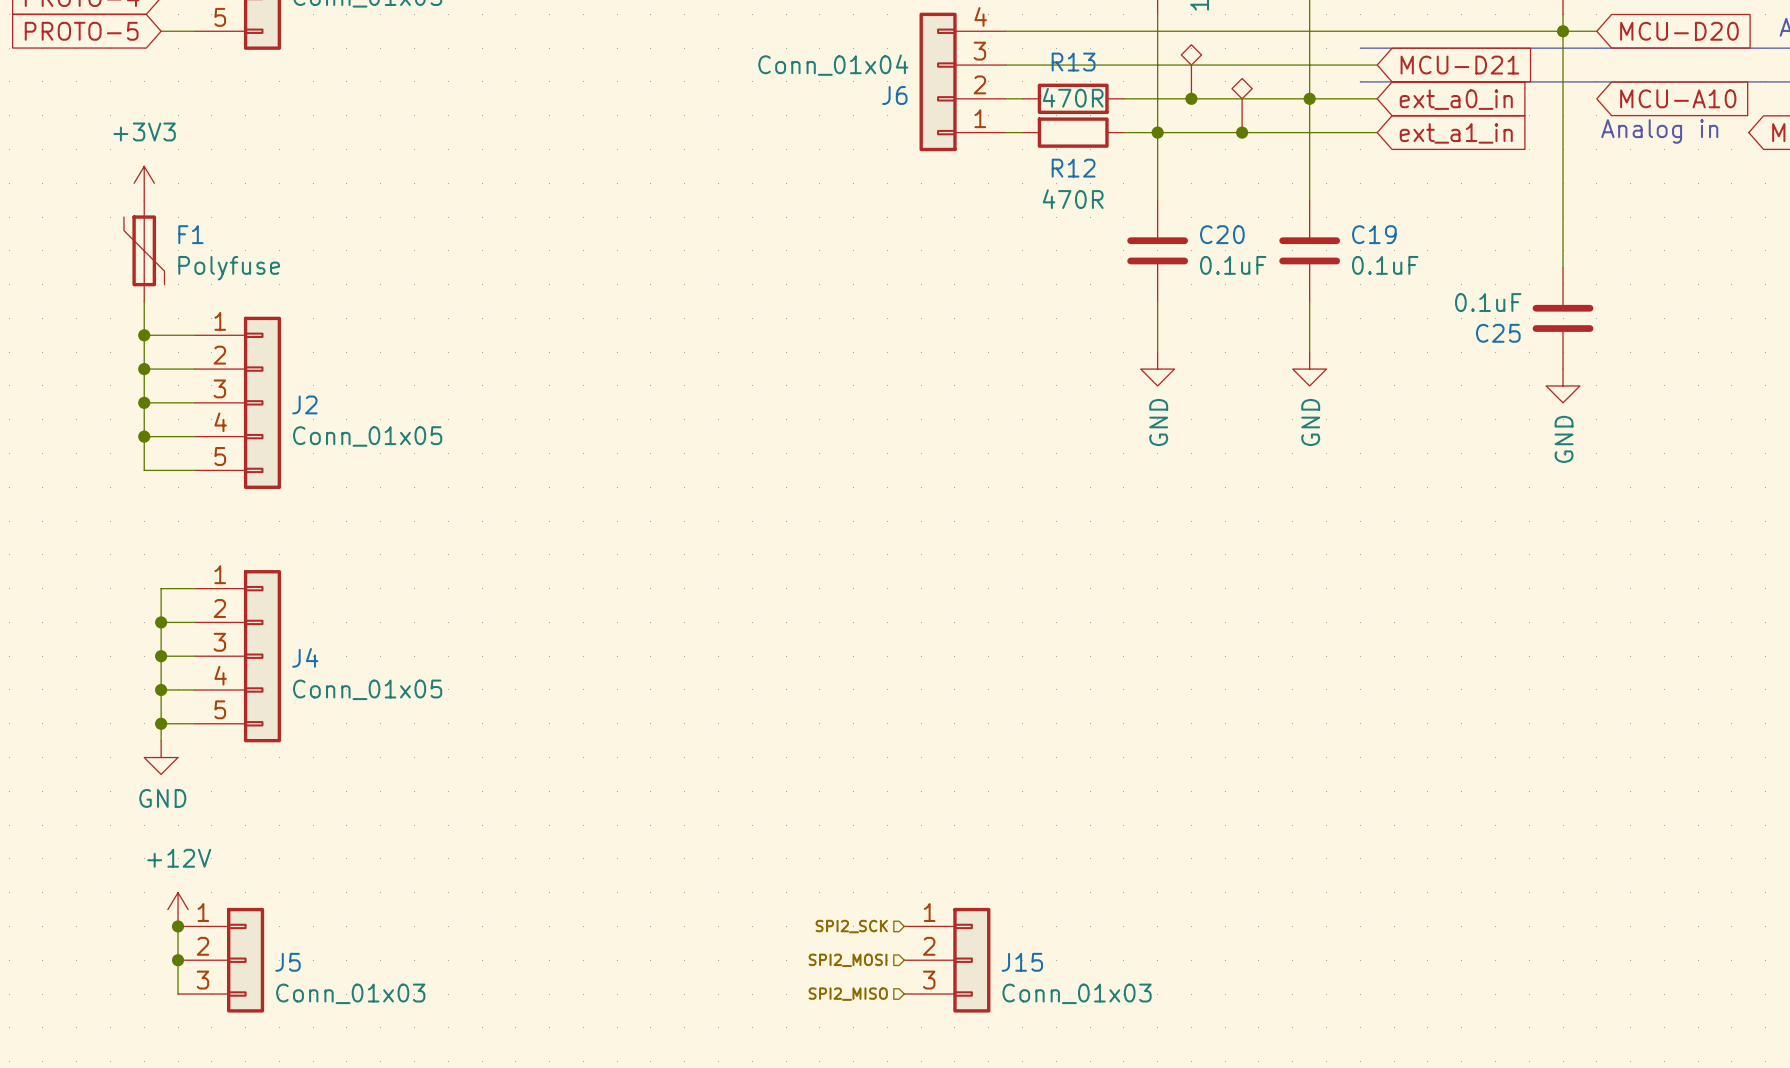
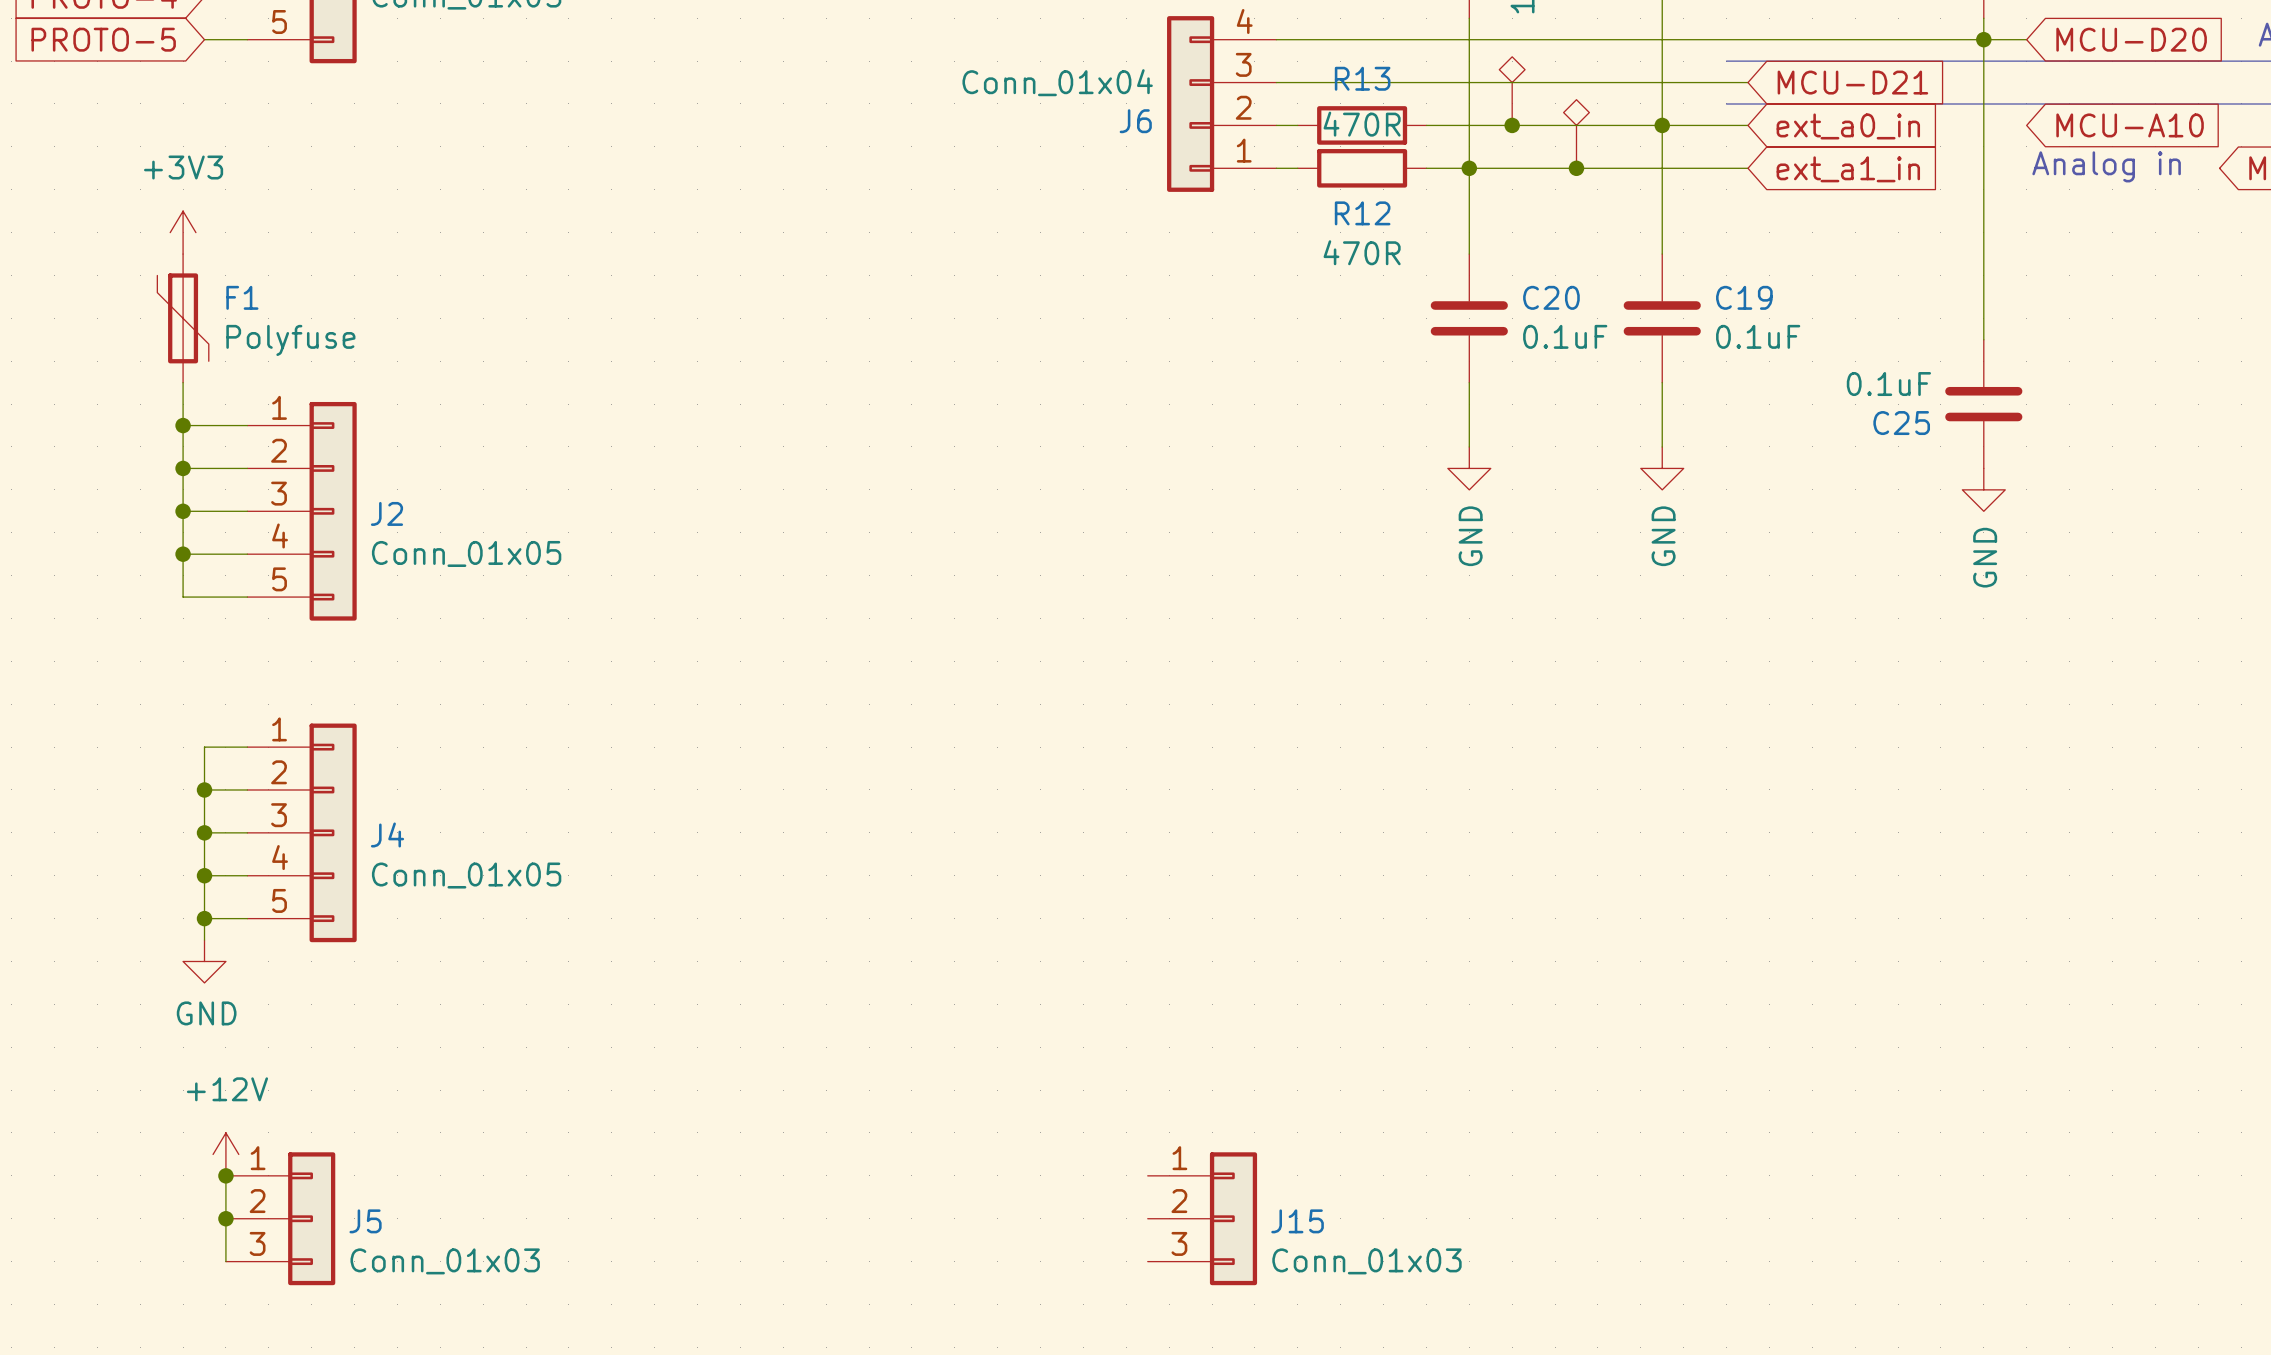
hierarchical label: SPI2_SCK (851, 926) -> none
hierarchical label: SPI2_MOSI (848, 960) -> none
hierarchical label: SPI2_MISO (848, 994) -> none

